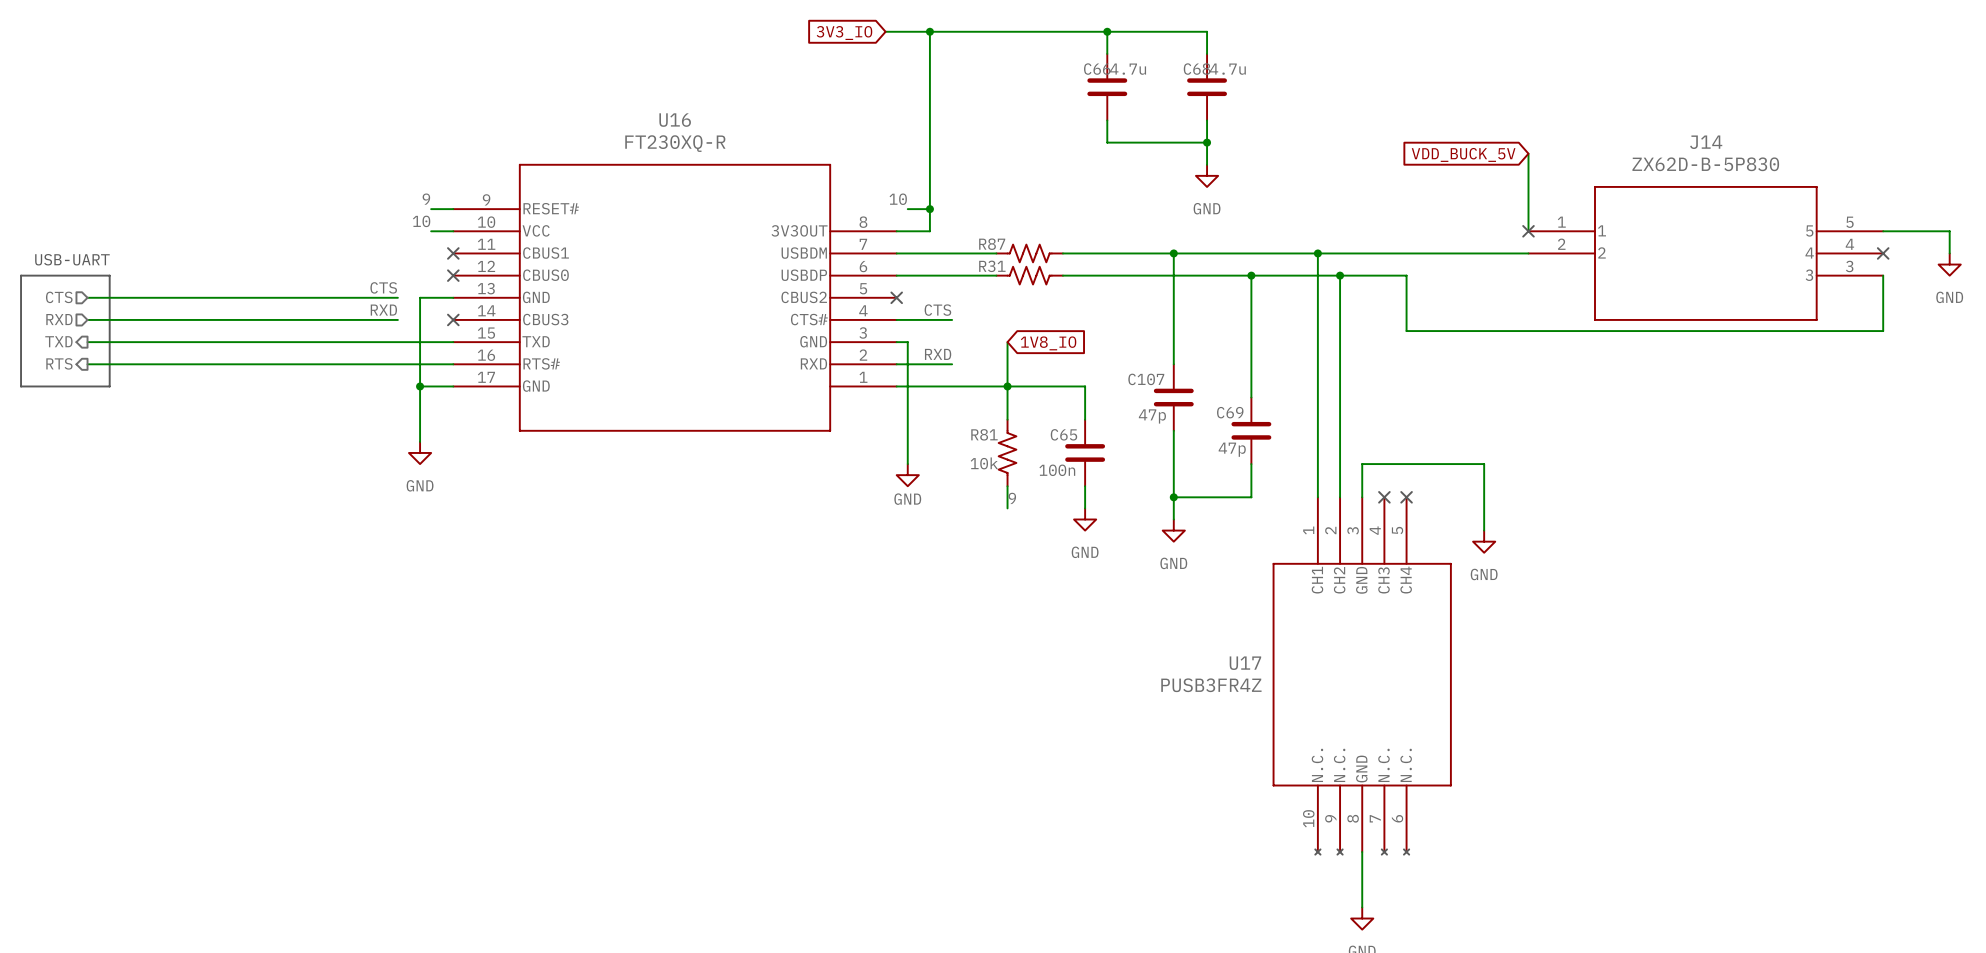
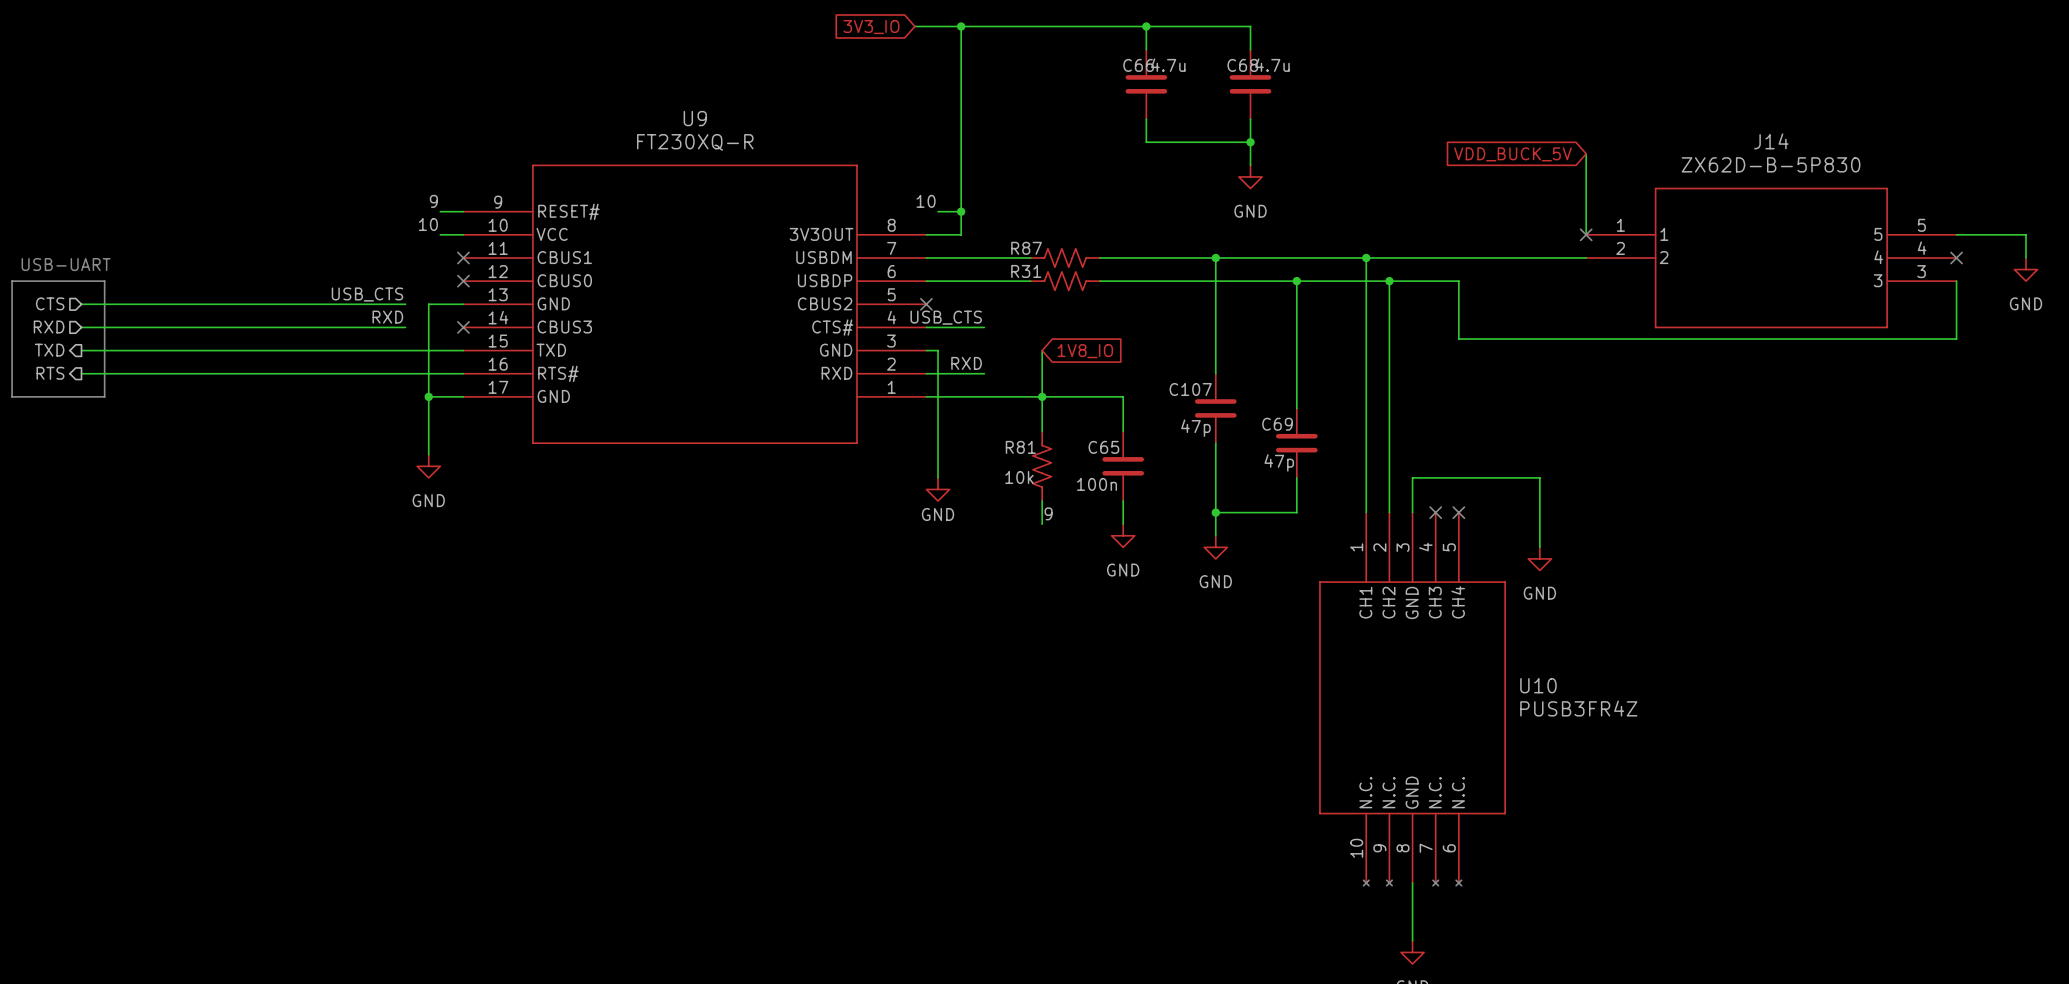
U16 name: U16 (675, 120) -> U9 (695, 118)
label: CTS (383, 287) -> USB_CTS (367, 294)
label: CTS (937, 310) -> USB_CTS (946, 317)
U17 name: U17 (1245, 663) -> U10 (1538, 685)
U17 value position: PUSB3FR4Z (1211, 685) -> PUSB3FR4Z (1578, 708)

